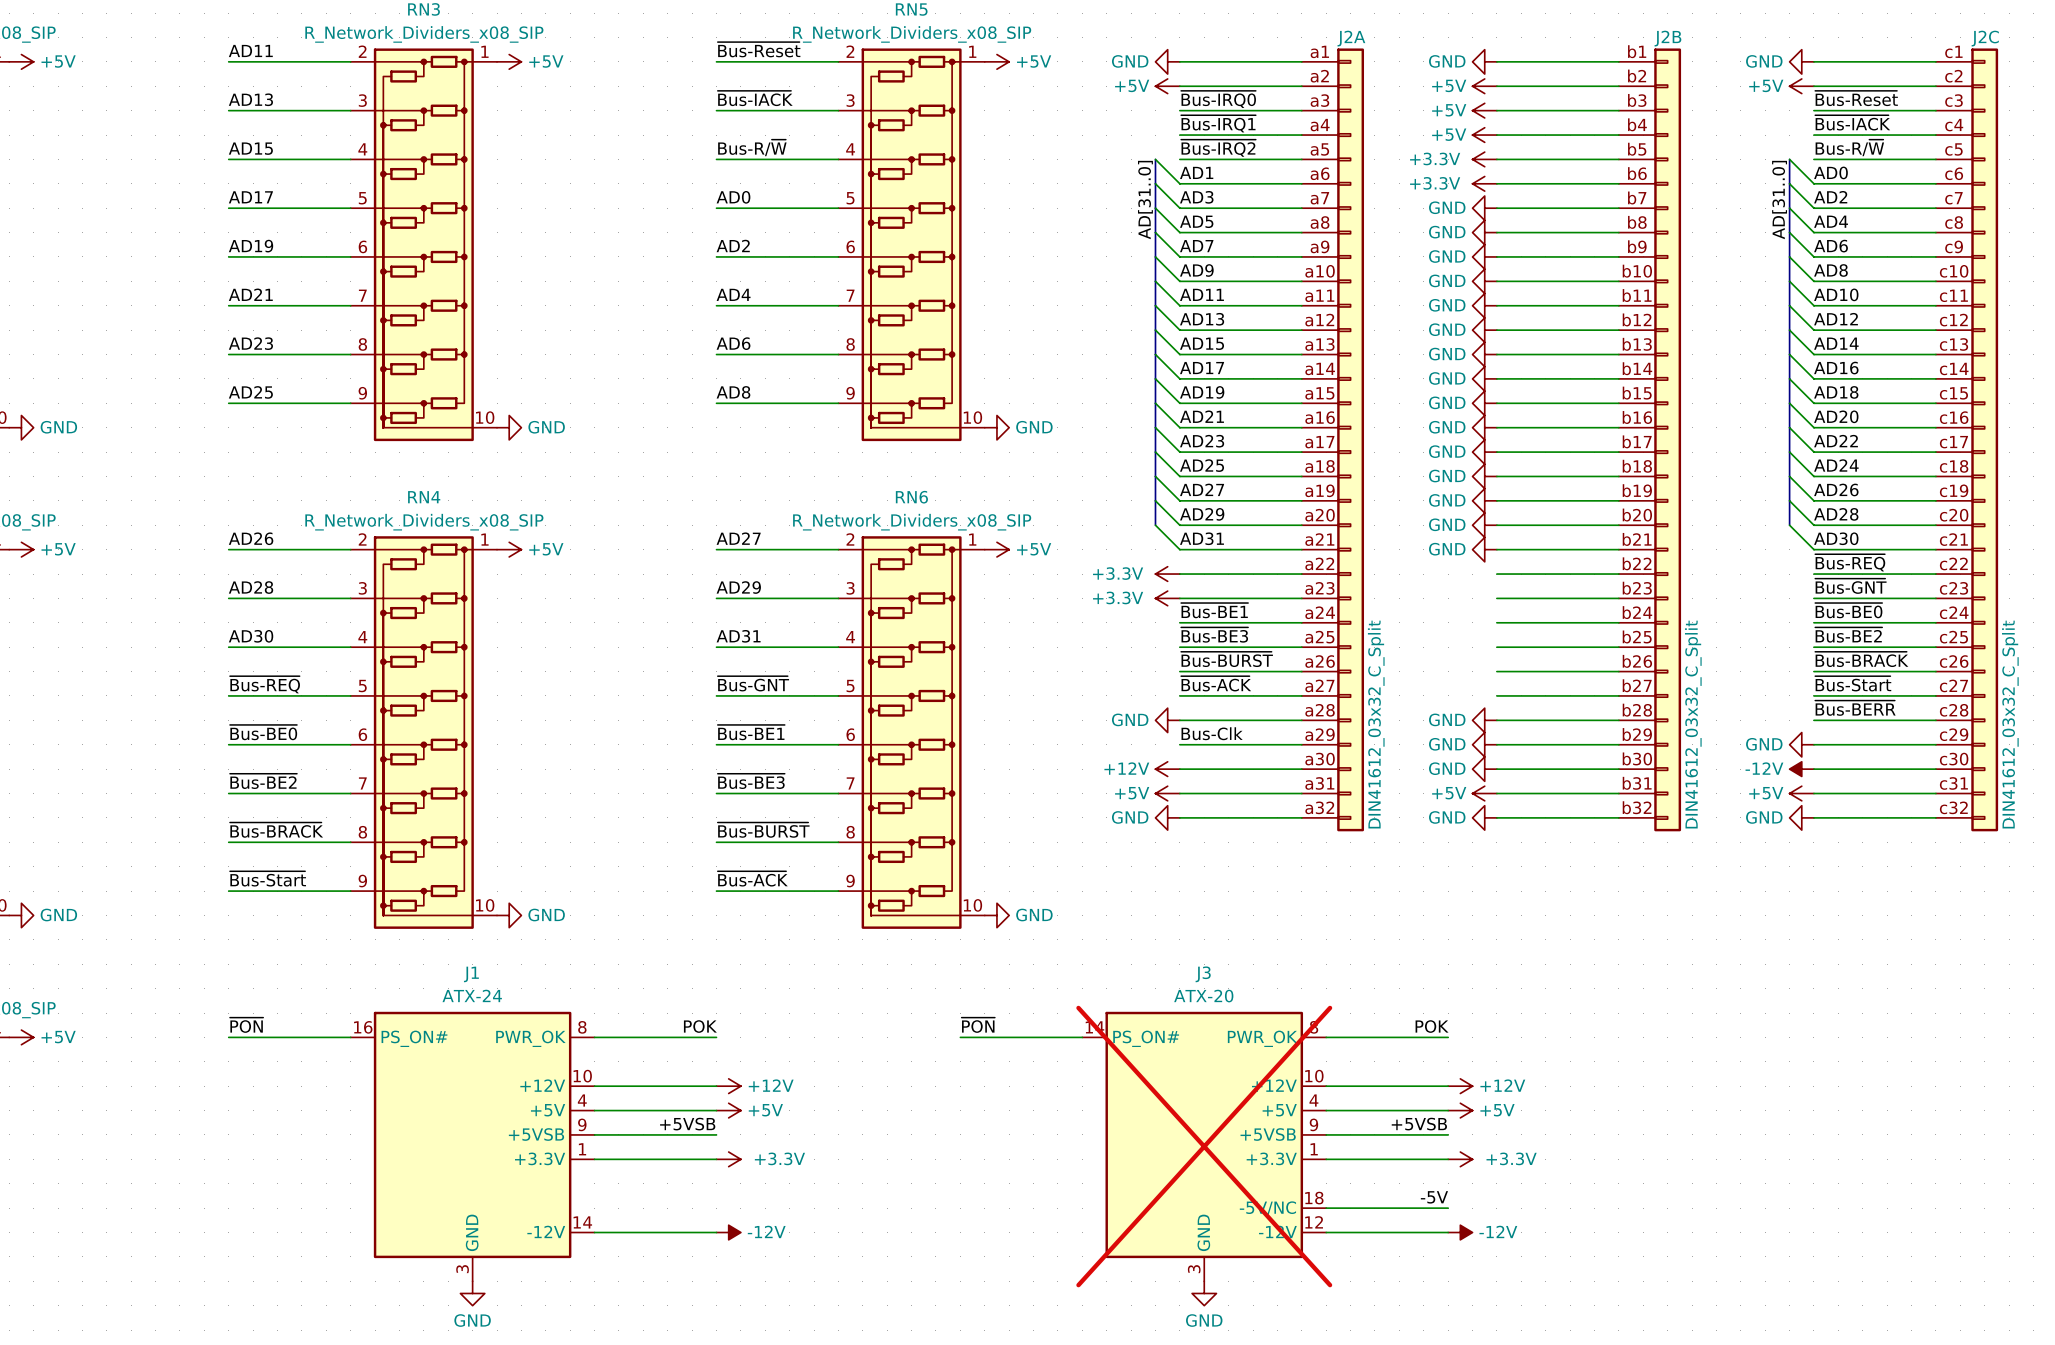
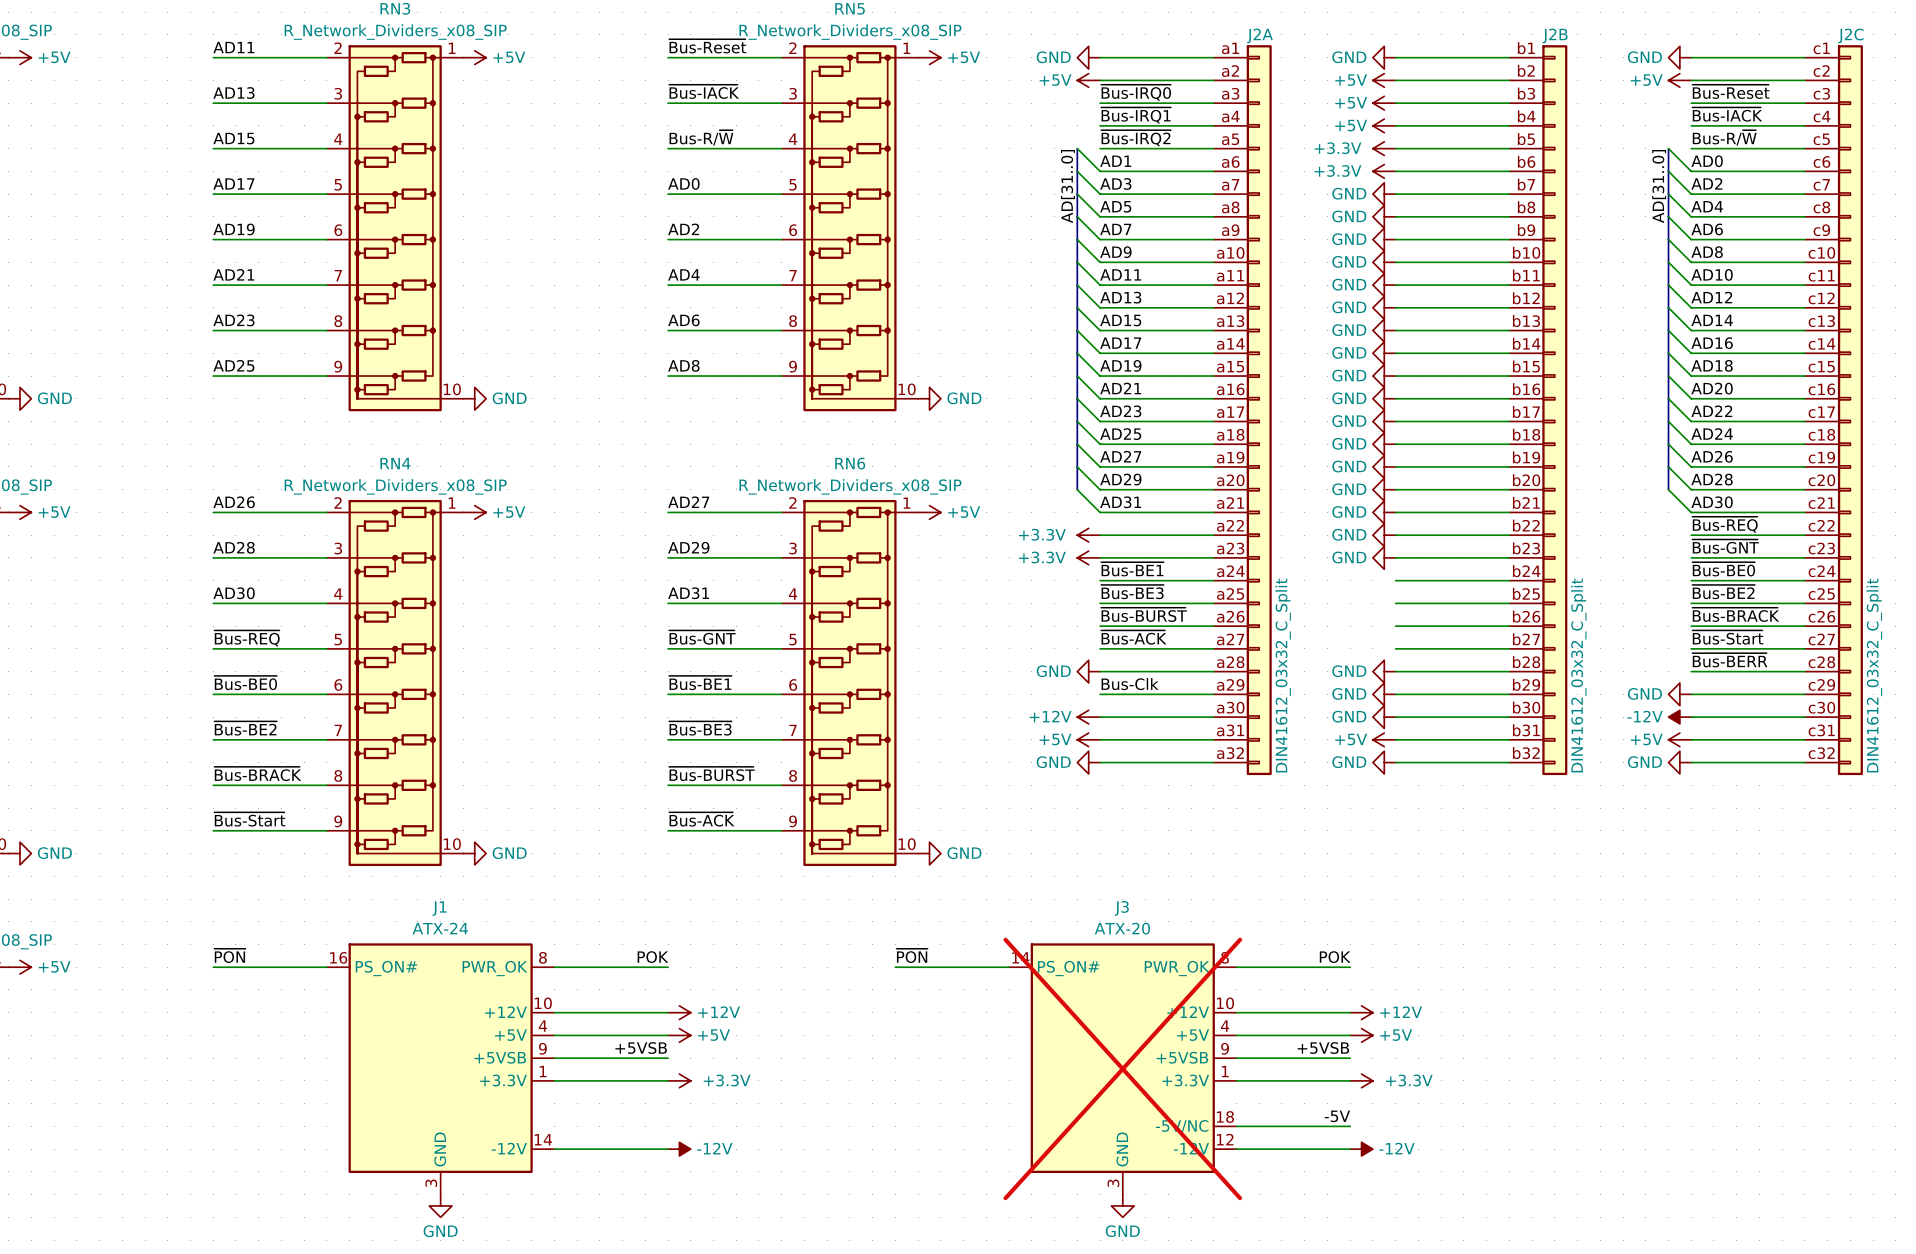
power symbol: none -> GND (1384, 535)
power symbol: none -> GND (1384, 557)

